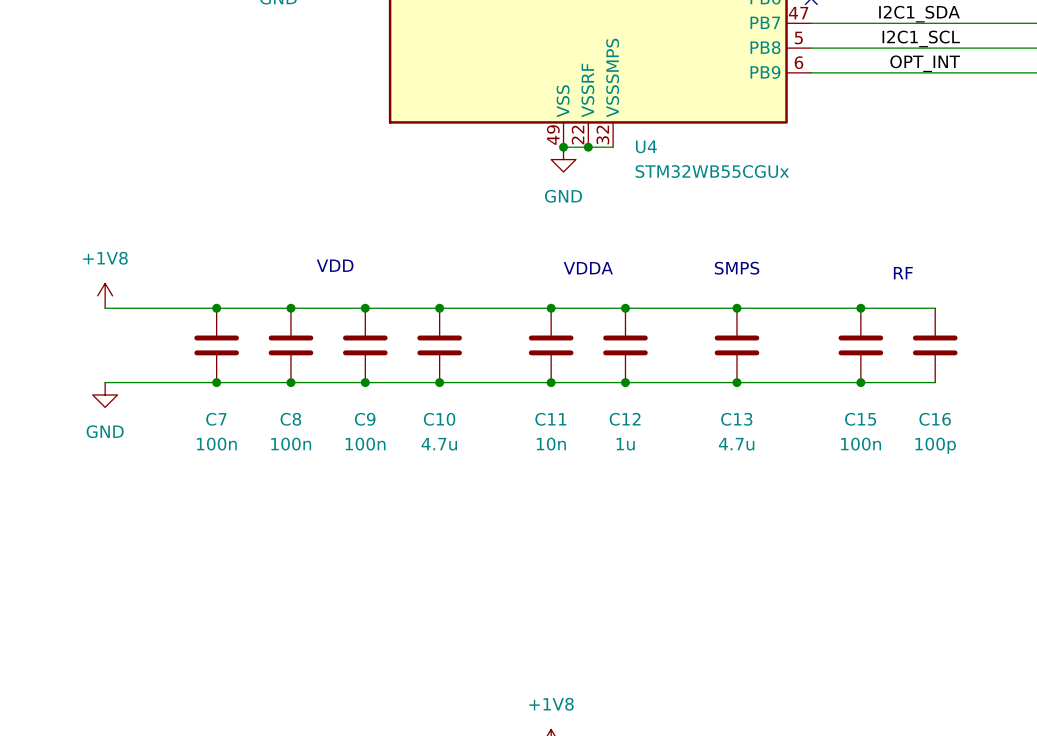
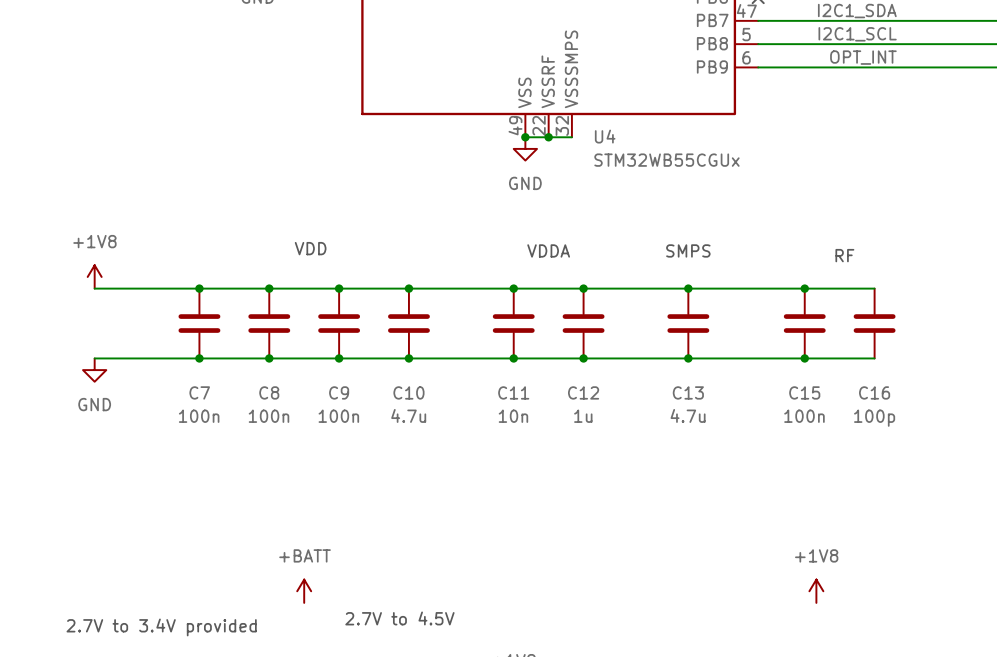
power symbol: none -> +BATT (304, 591)
power symbol: none -> +1V8 (816, 591)
text: none -> 2.7V to 4.5V (399, 618)
text: none -> 2.7V to 3.4V provided (161, 627)

